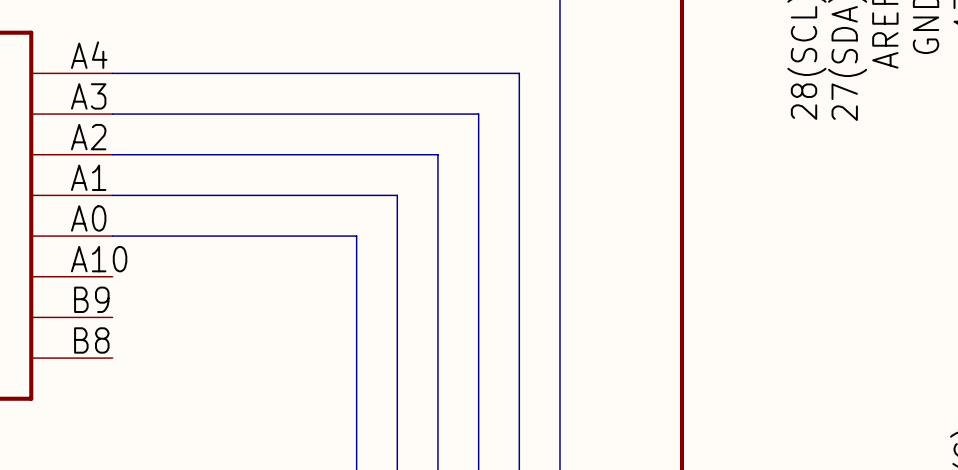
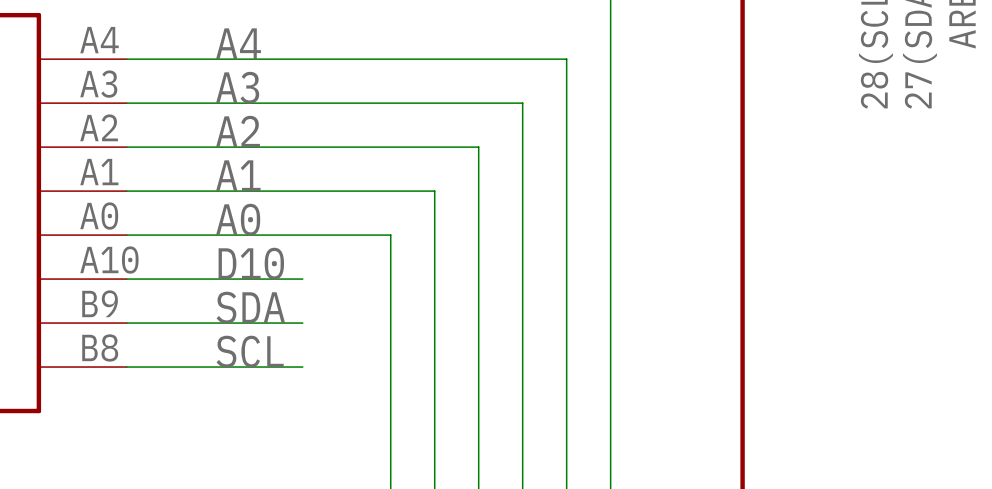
label: none -> A4 (238, 43)
label: none -> A3 (237, 87)
label: none -> A2 (237, 131)
label: none -> A1 (238, 175)
label: none -> A0 (238, 219)
label: none -> D10 (251, 263)
wire: none -> (126, 279) (302, 279)
label: none -> SDA (250, 307)
wire: none -> (126, 323) (302, 323)
label: none -> SCL (250, 351)
wire: none -> (126, 367) (302, 367)

